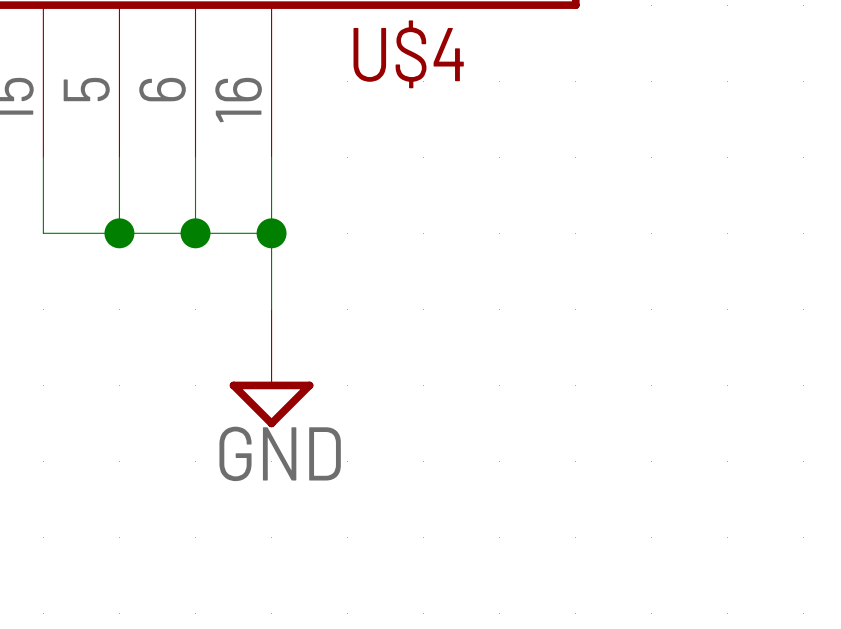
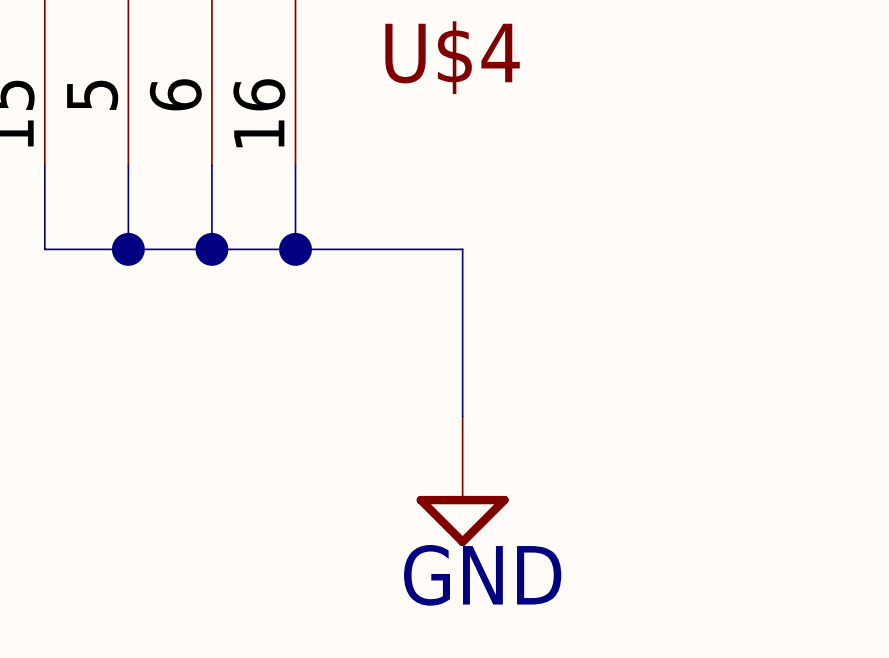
wire: (271, 233) (271, 309) -> (295, 249) (462, 249) (462, 416)
power symbol position: GND (271, 368) -> GND (462, 481)

